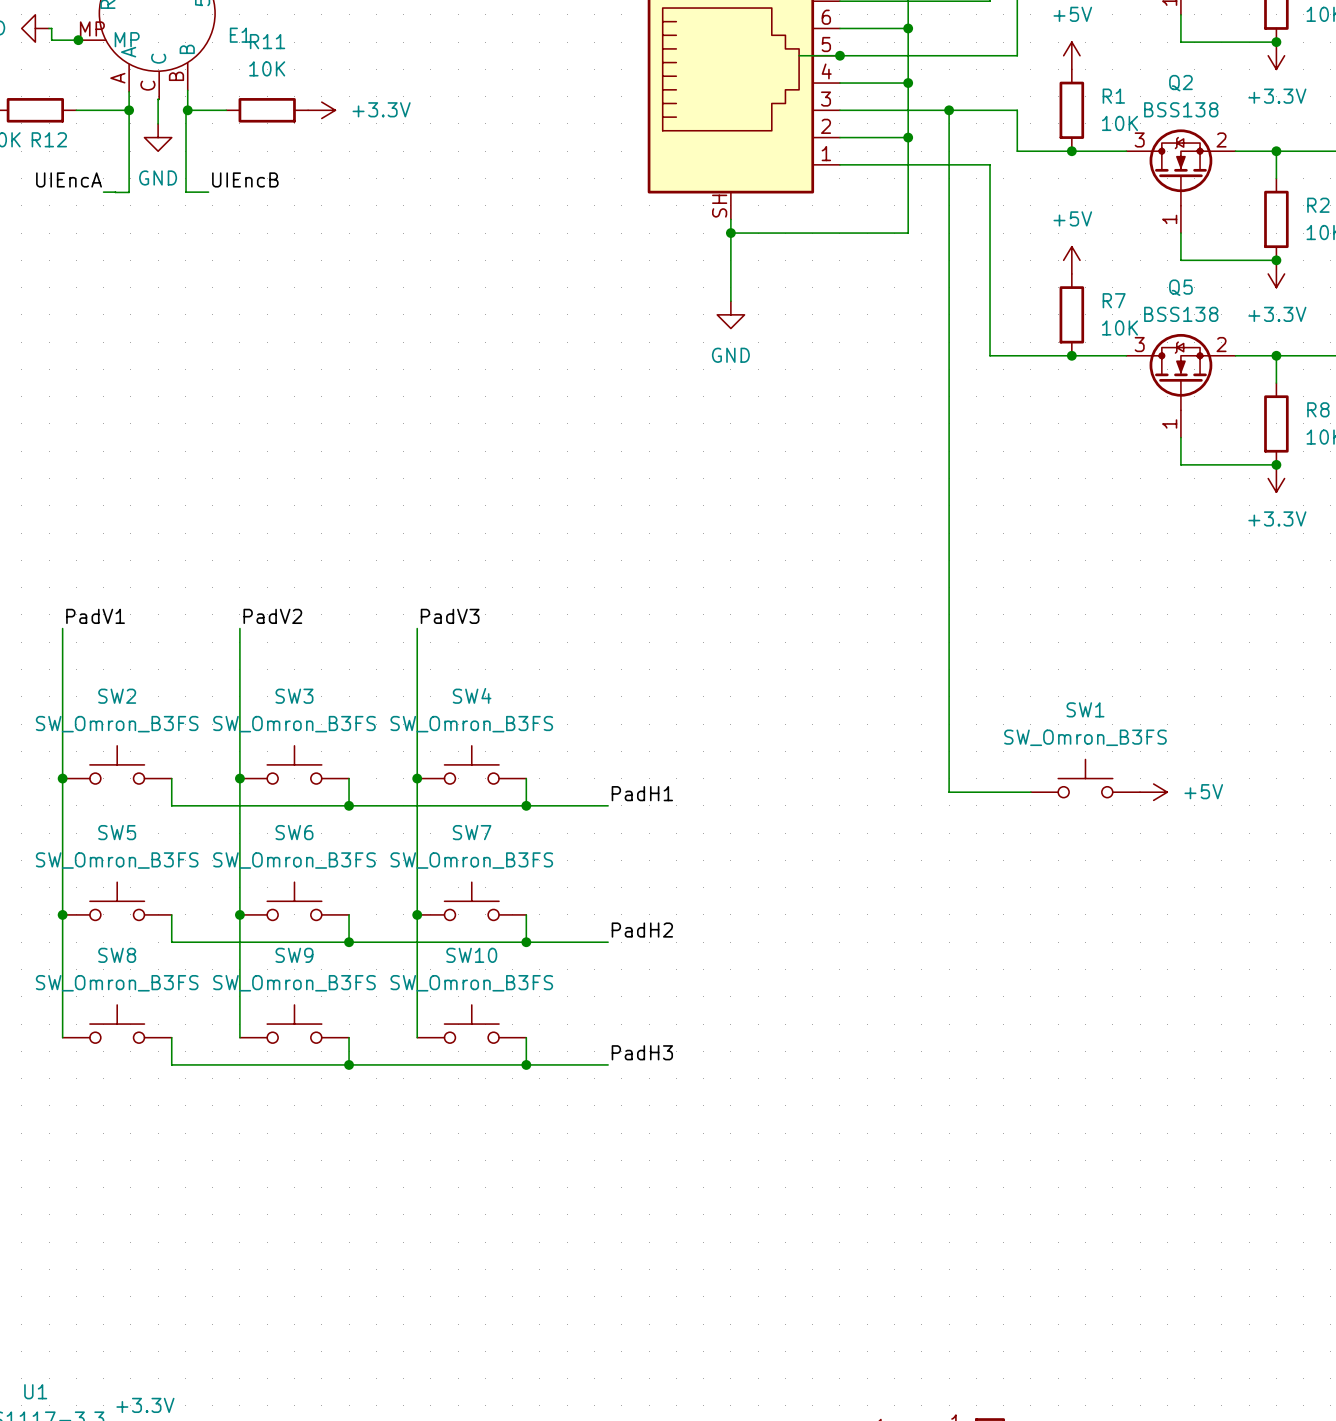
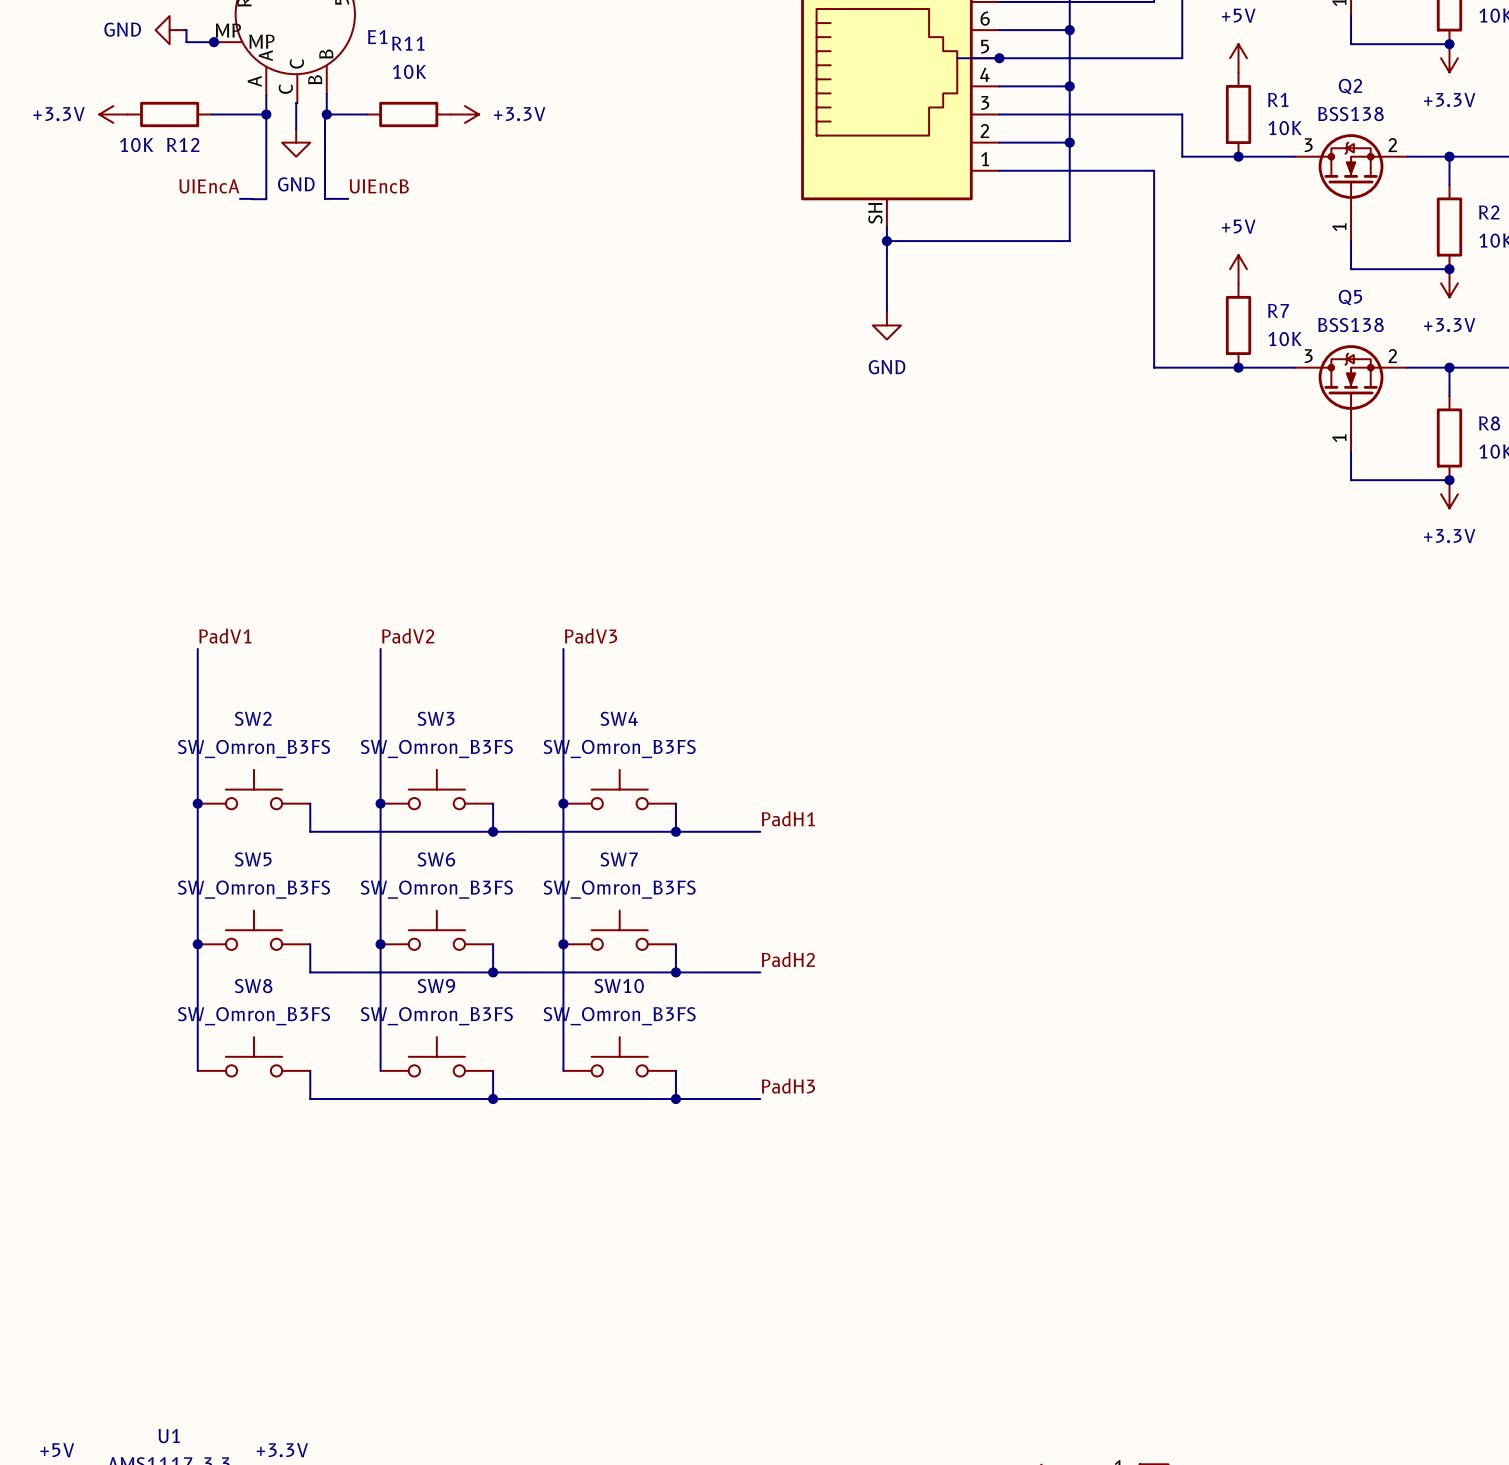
wire: (949, 110) (949, 792) (1030, 792) -> none
junction: (949, 110) -> none
SW1: SW_Omron_B3FS (1085, 778) -> none
power symbol: +5V (1153, 792) -> none

